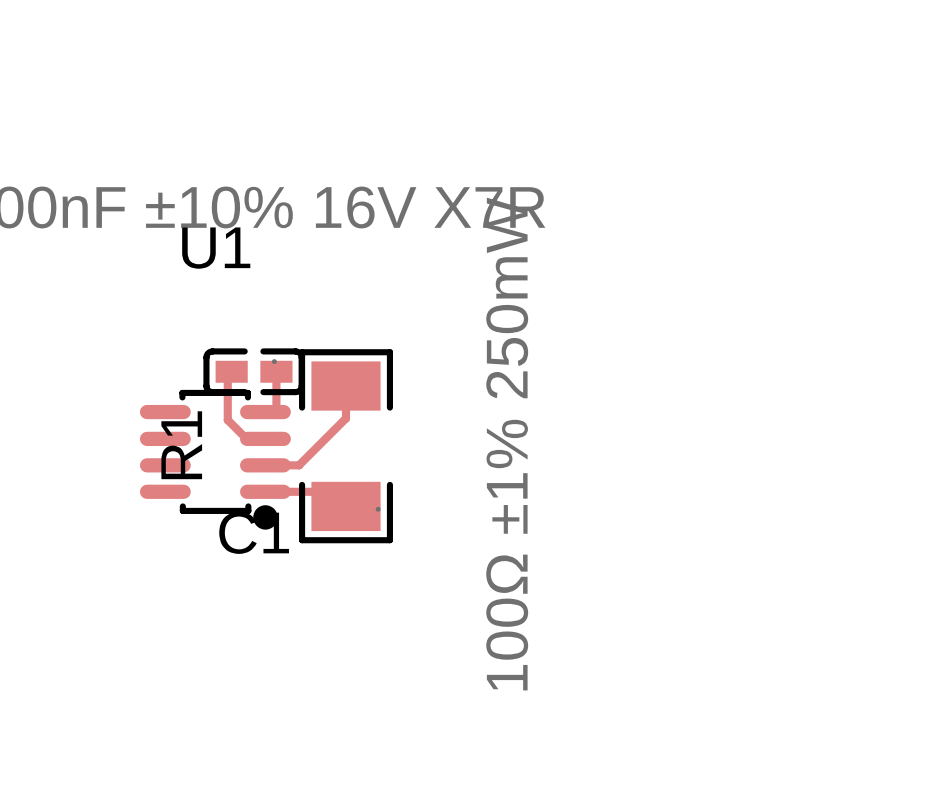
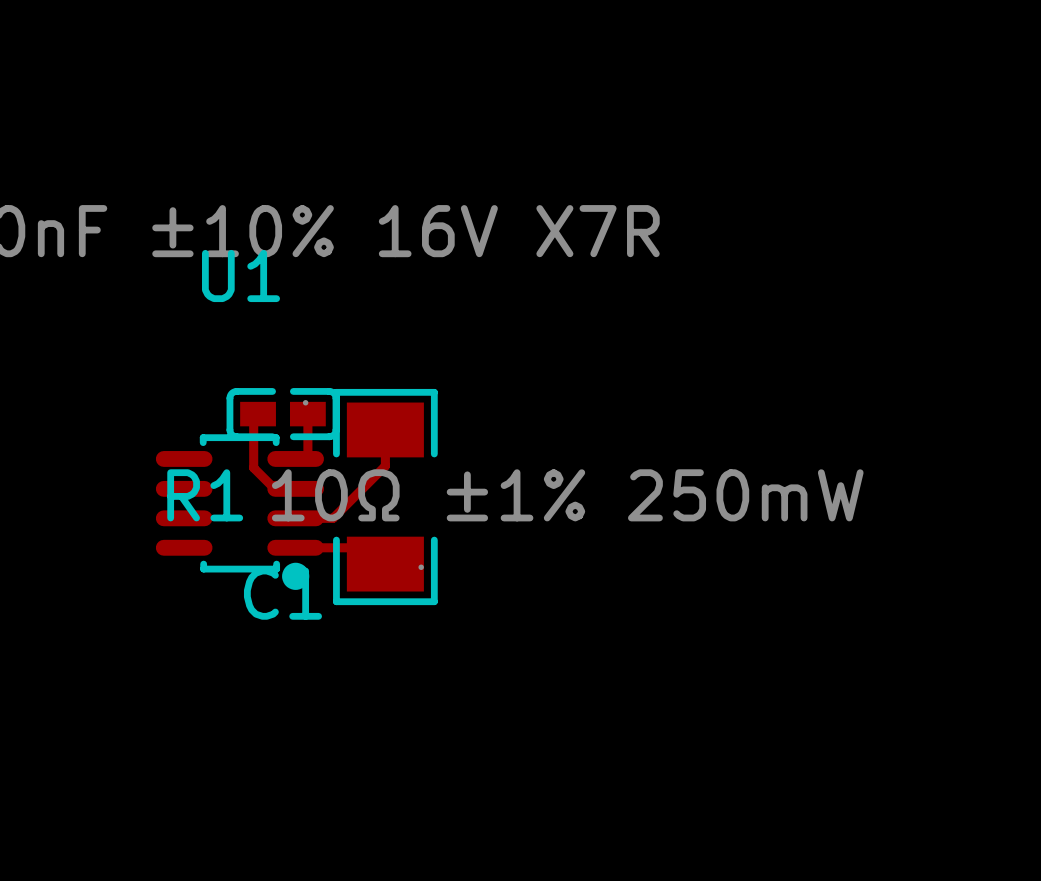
R1 value: 100Ω ±1% 250mW (507, 444) -> 10Ω ±1% 250mW (567, 495)
R1 name rotation: 0° (181, 445) -> 90° clockwise (205, 495)

